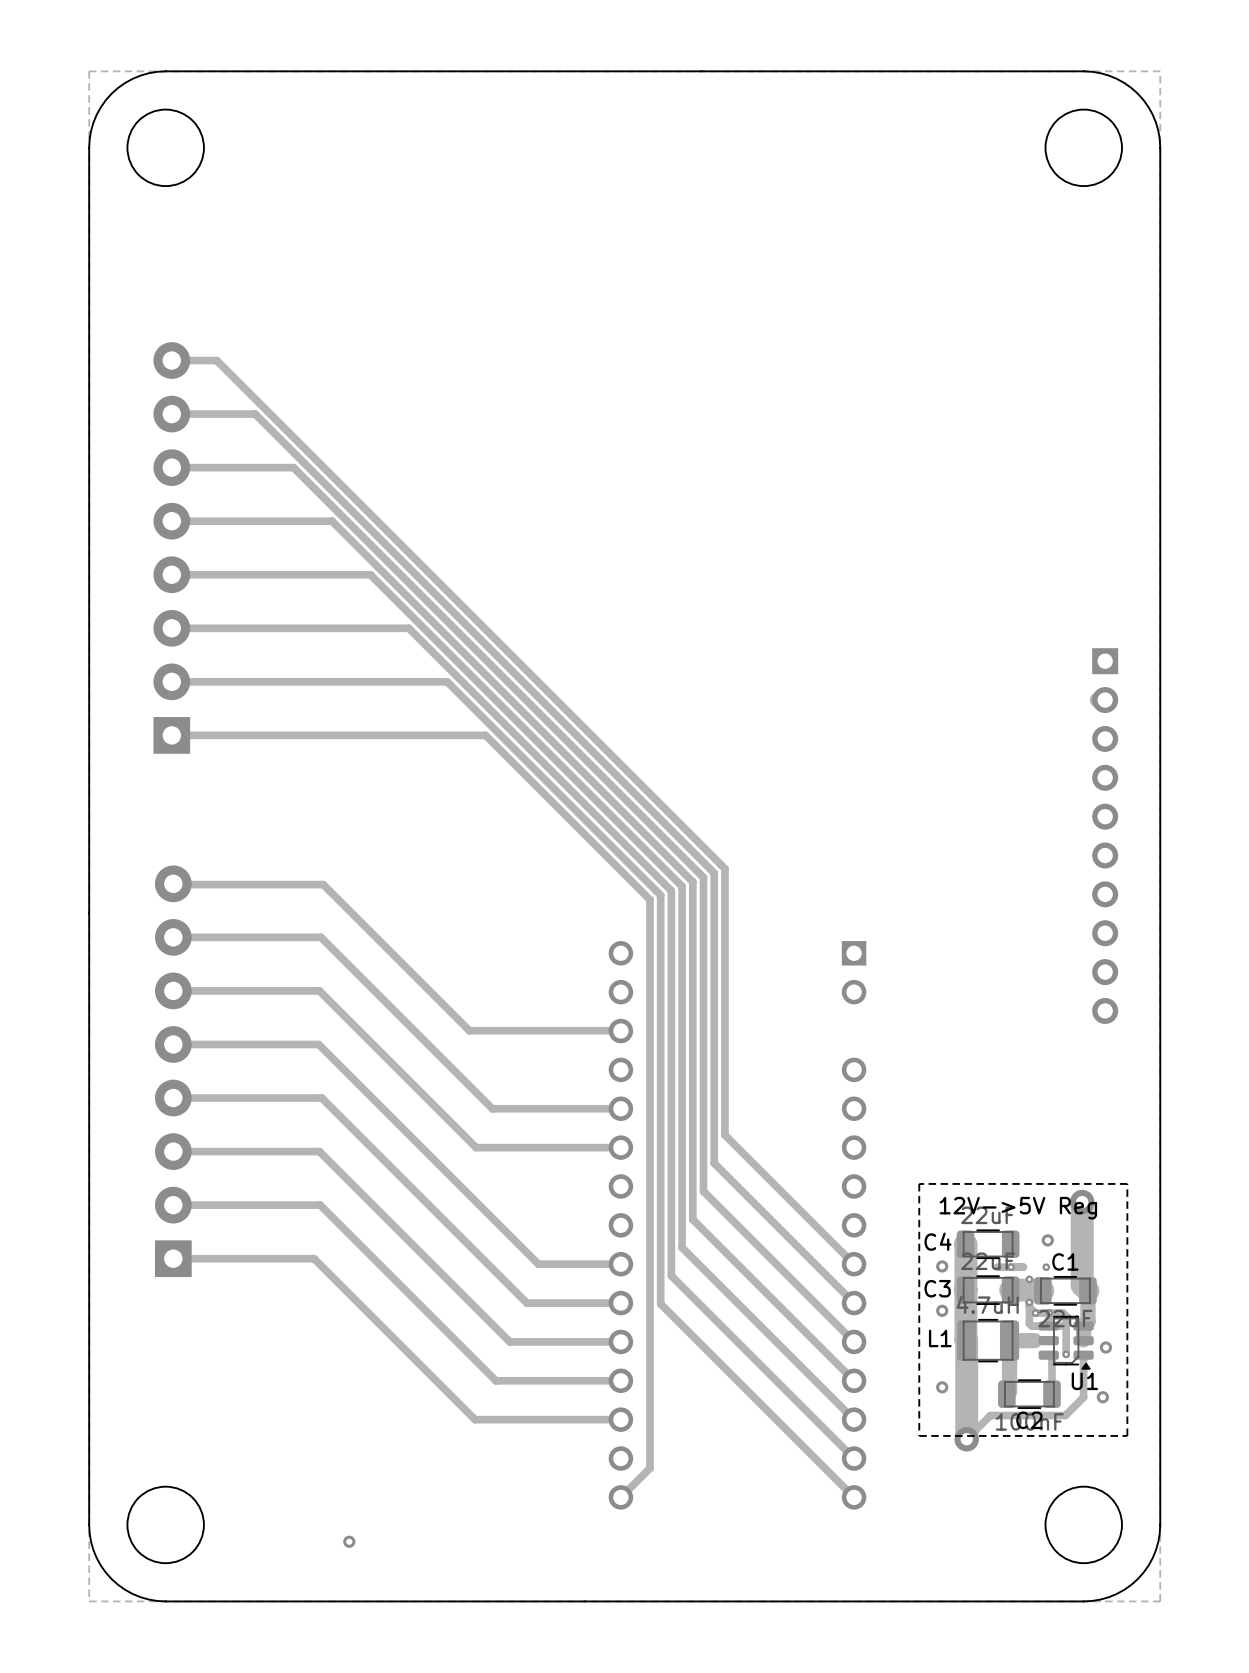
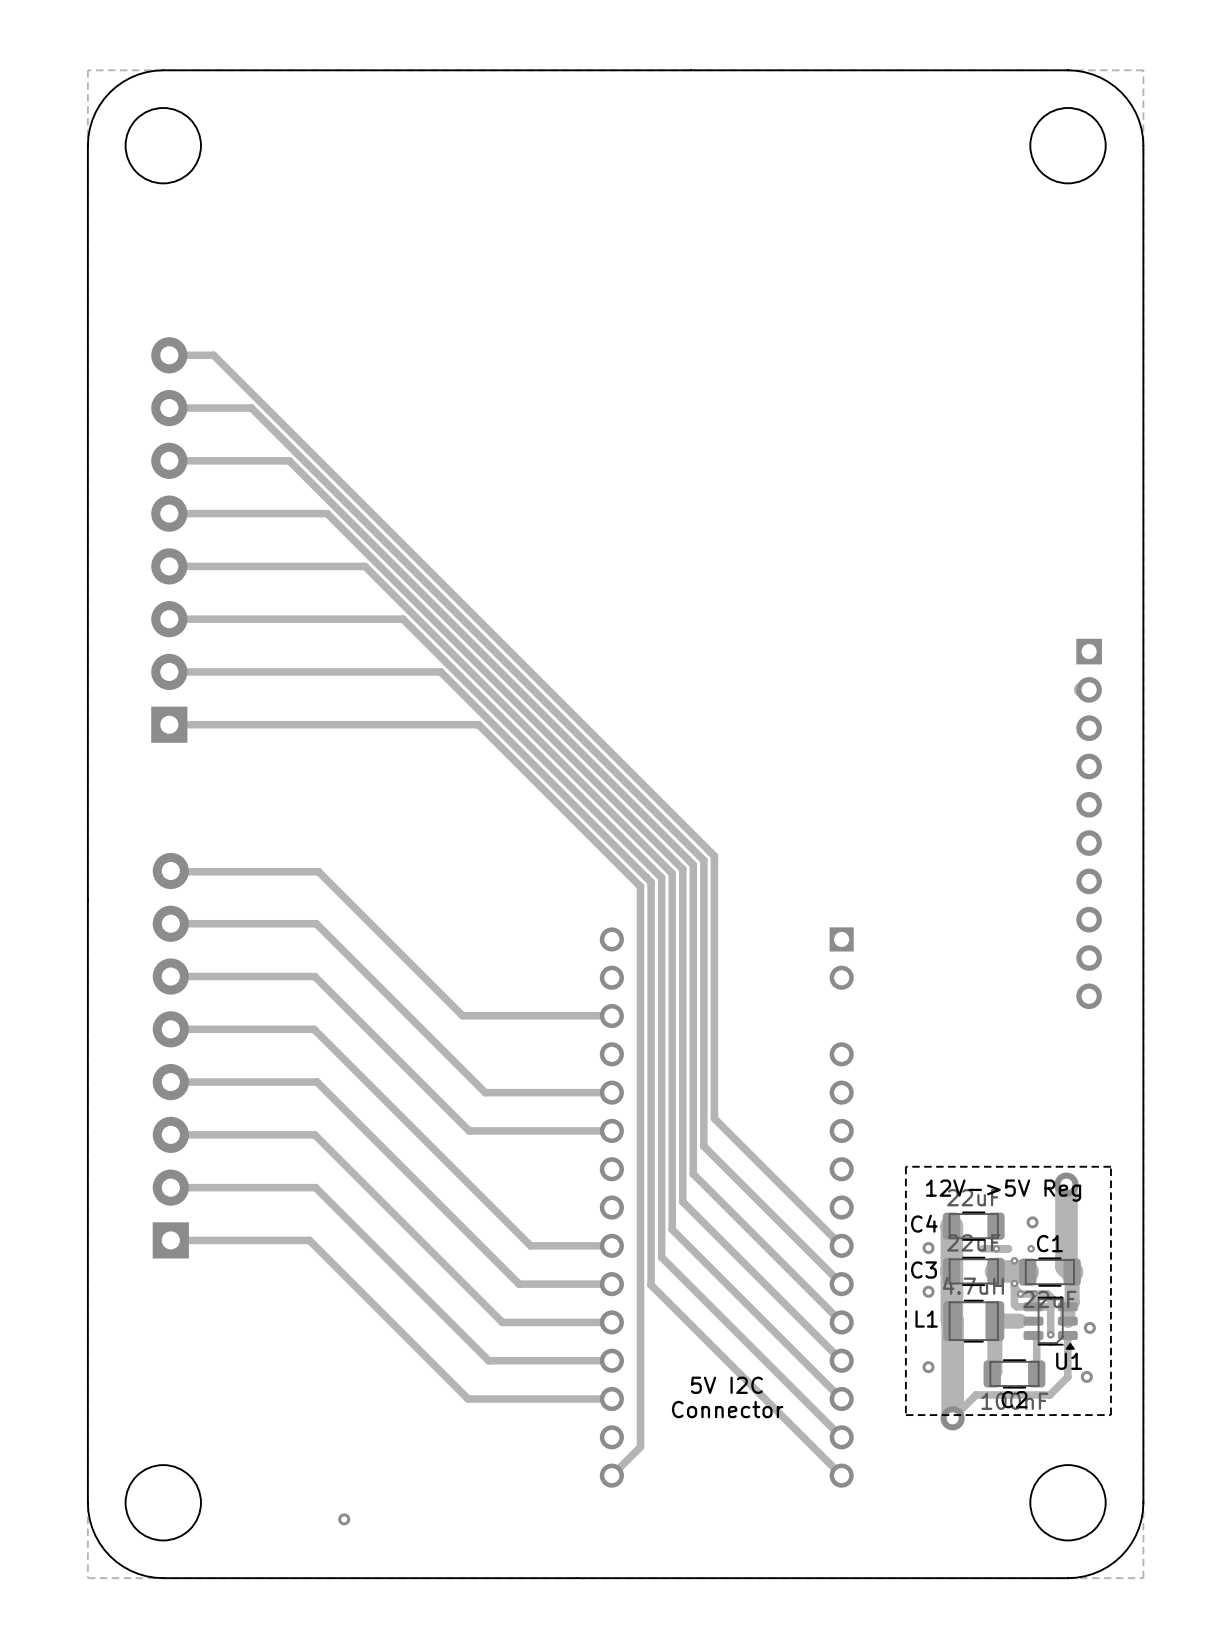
text: none -> 5V I2C (726, 1385)
text: none -> Connector (727, 1409)

